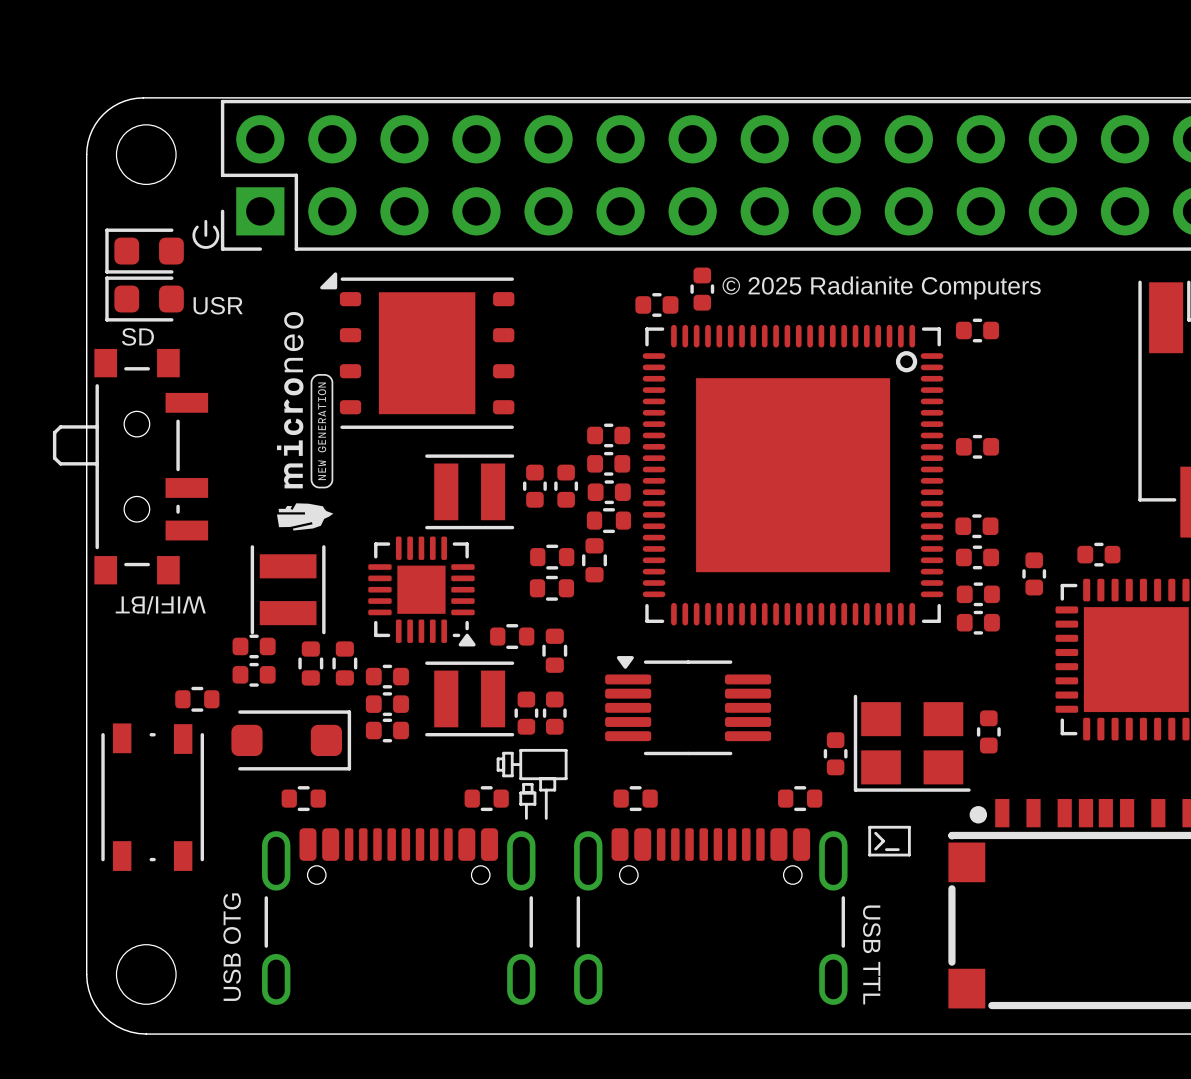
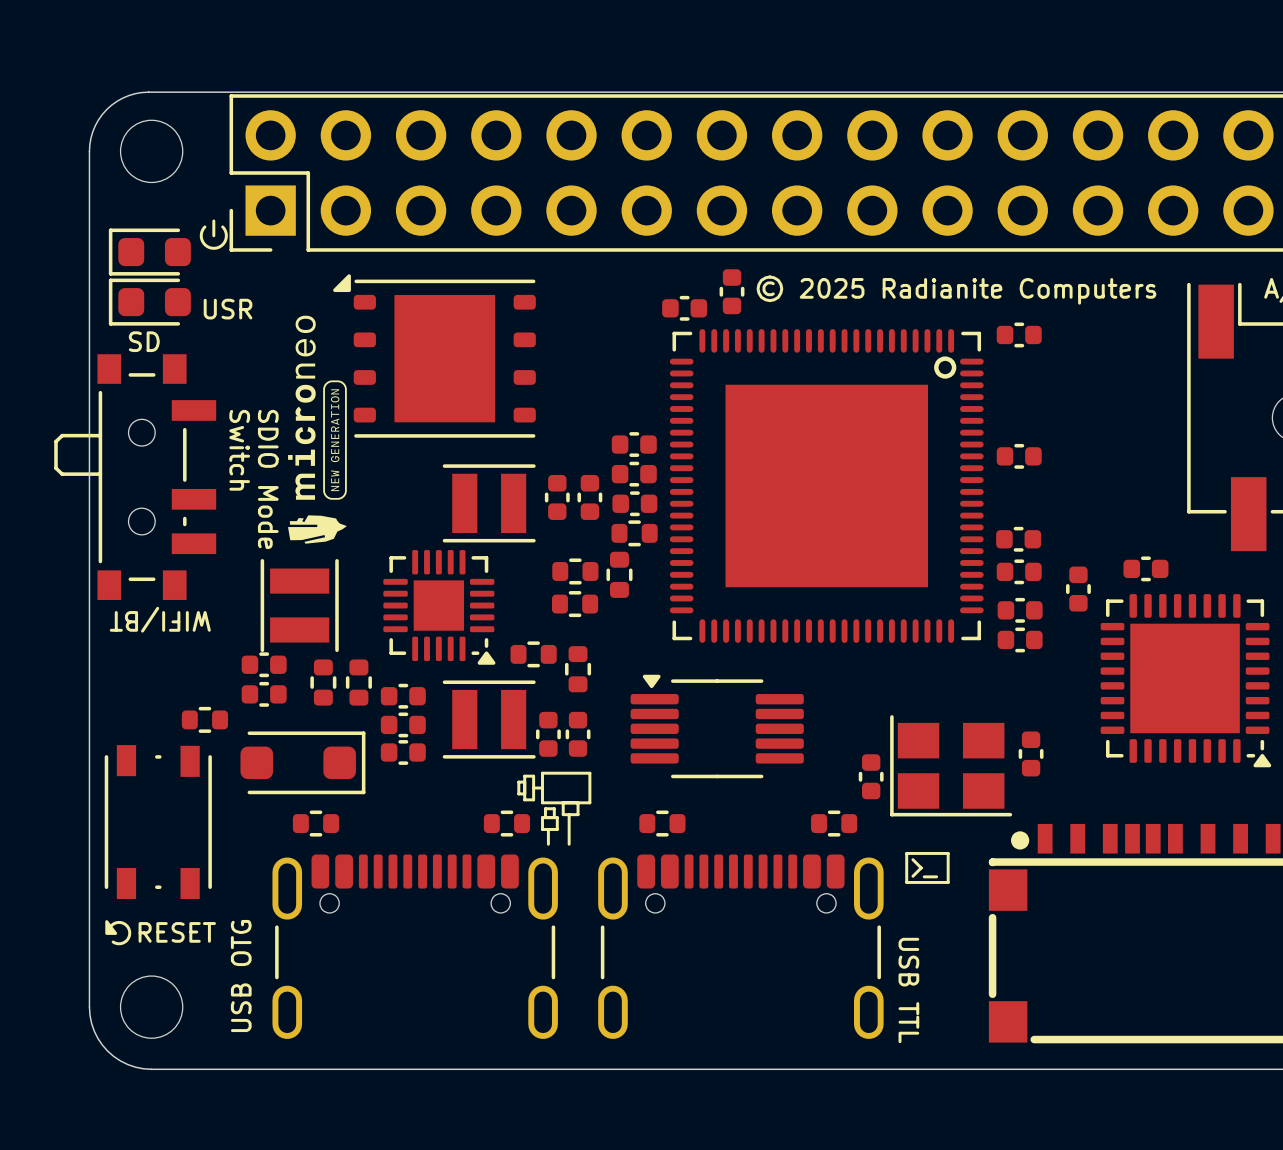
text: none -> Switch (239, 450)
text: none -> SDIO Mode (268, 479)
drawing: none -> [105, 920, 118, 935]
line: none -> (109, 928) (114, 923) (120, 922) (126, 925) (129, 930) (129, 935) (125, 941) (119, 943) (113, 941)
text: none -> RESET (177, 932)

